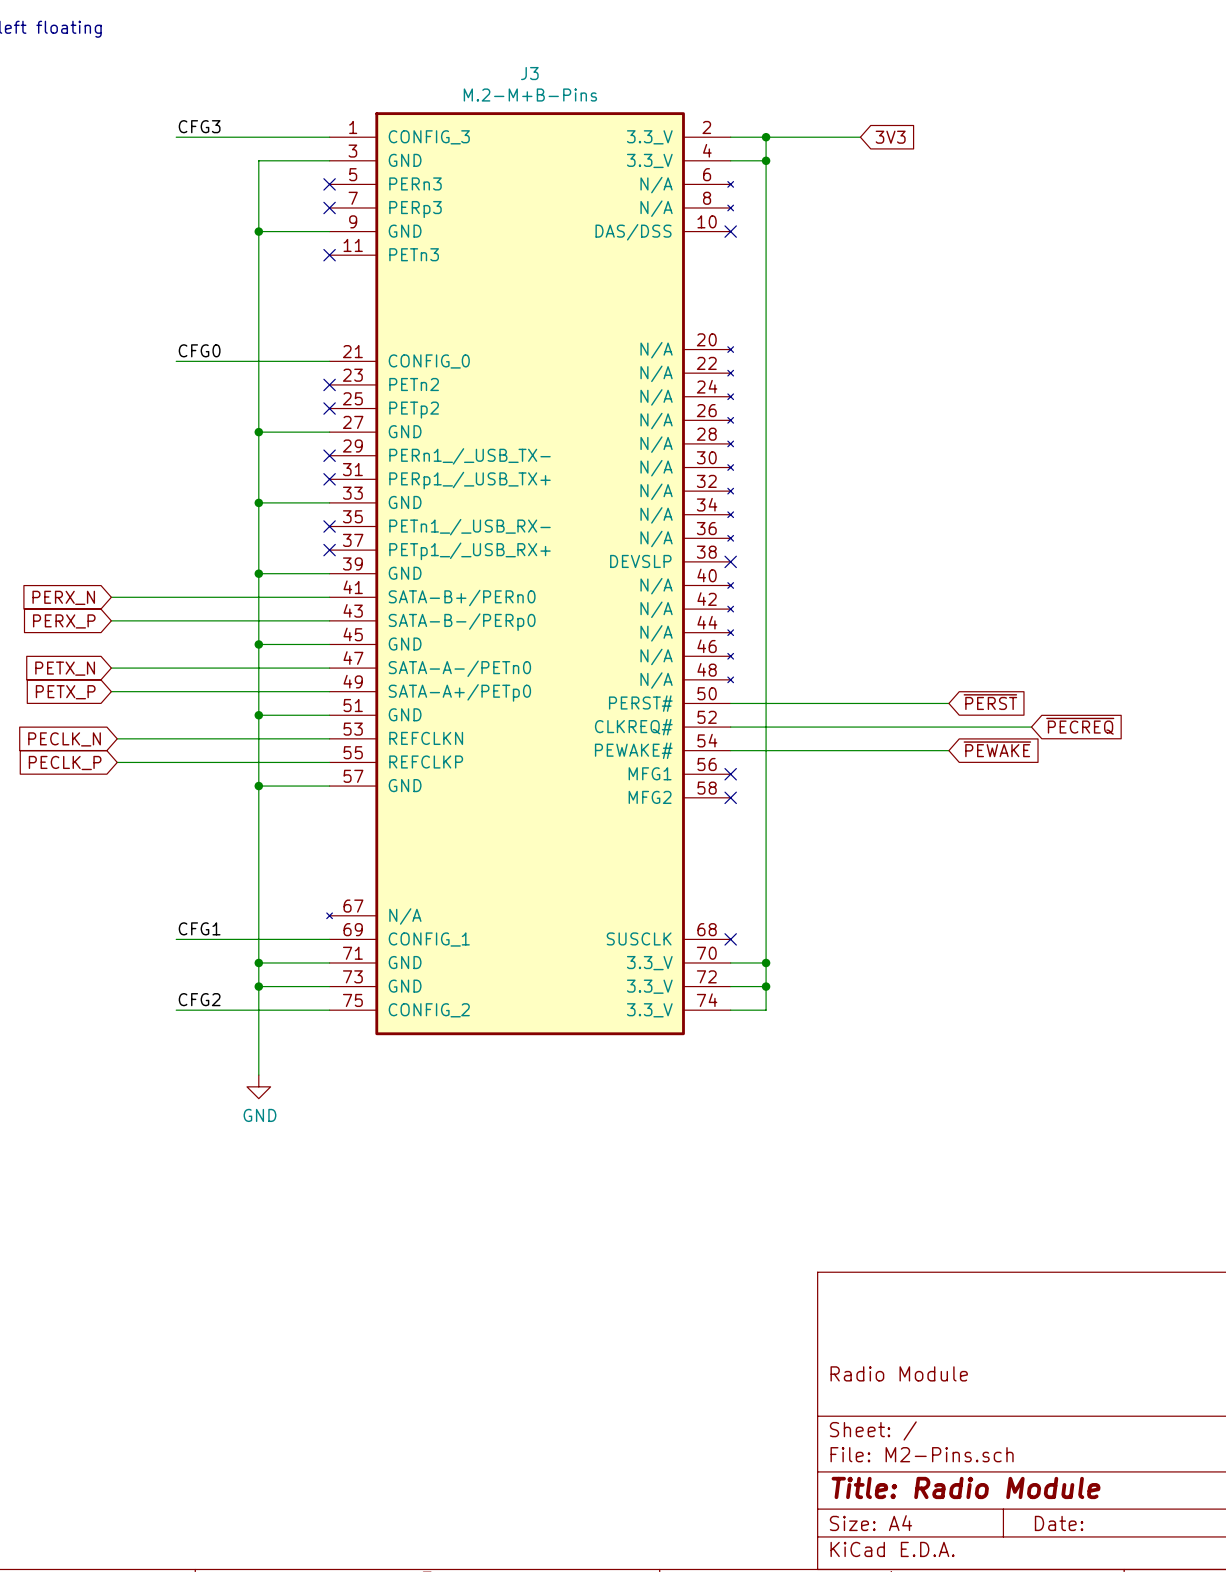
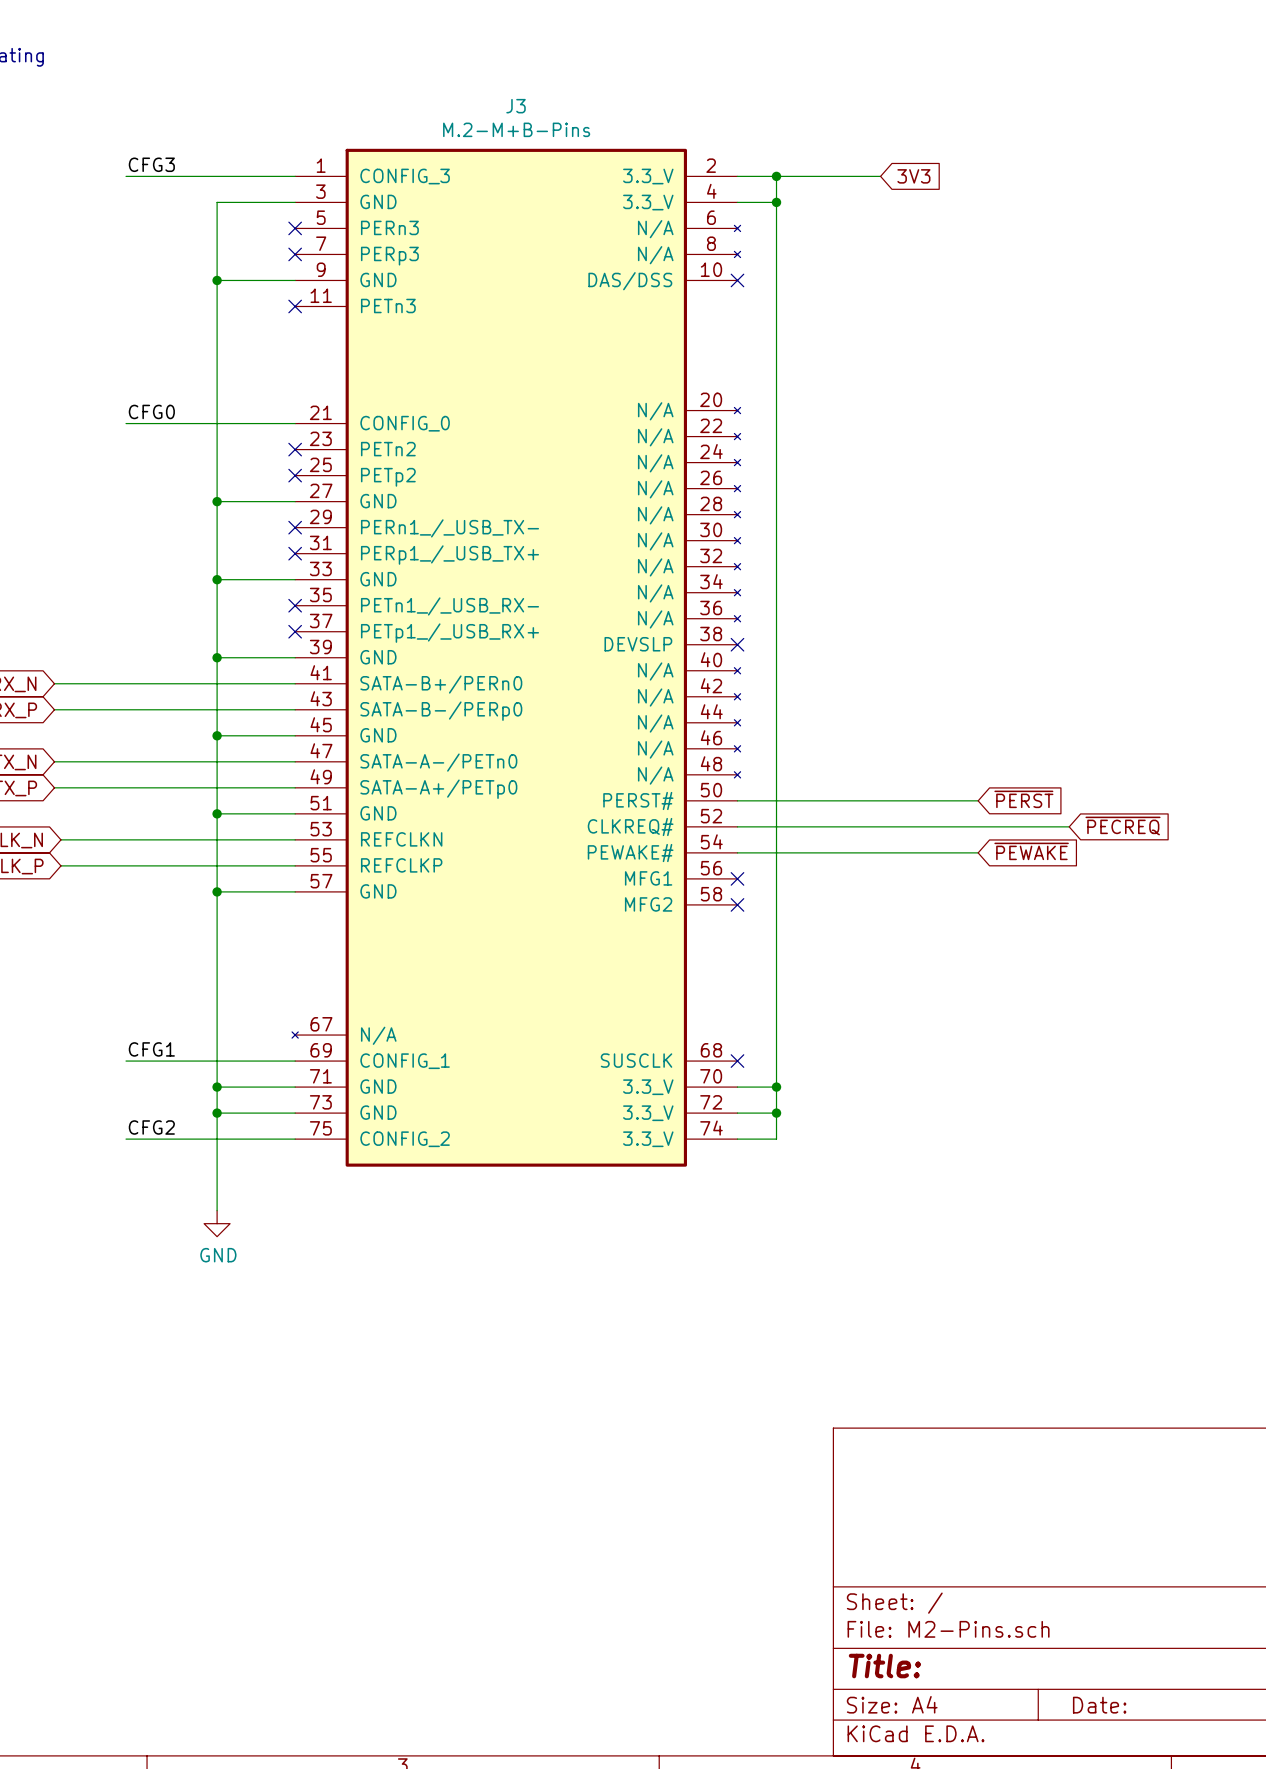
title block: Radio Module (899, 1373) -> none
title block: Title: Radio Module (966, 1487) -> Title: (884, 1666)

